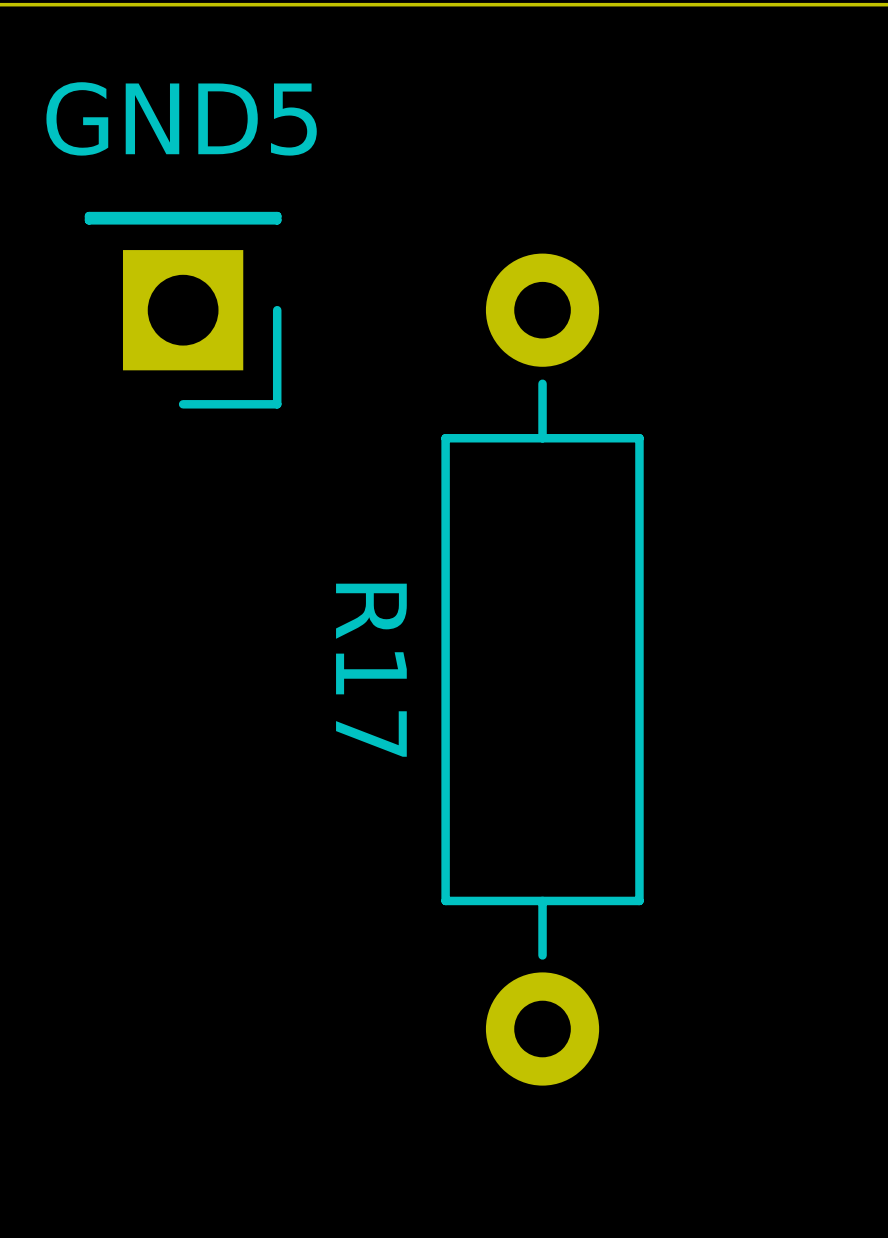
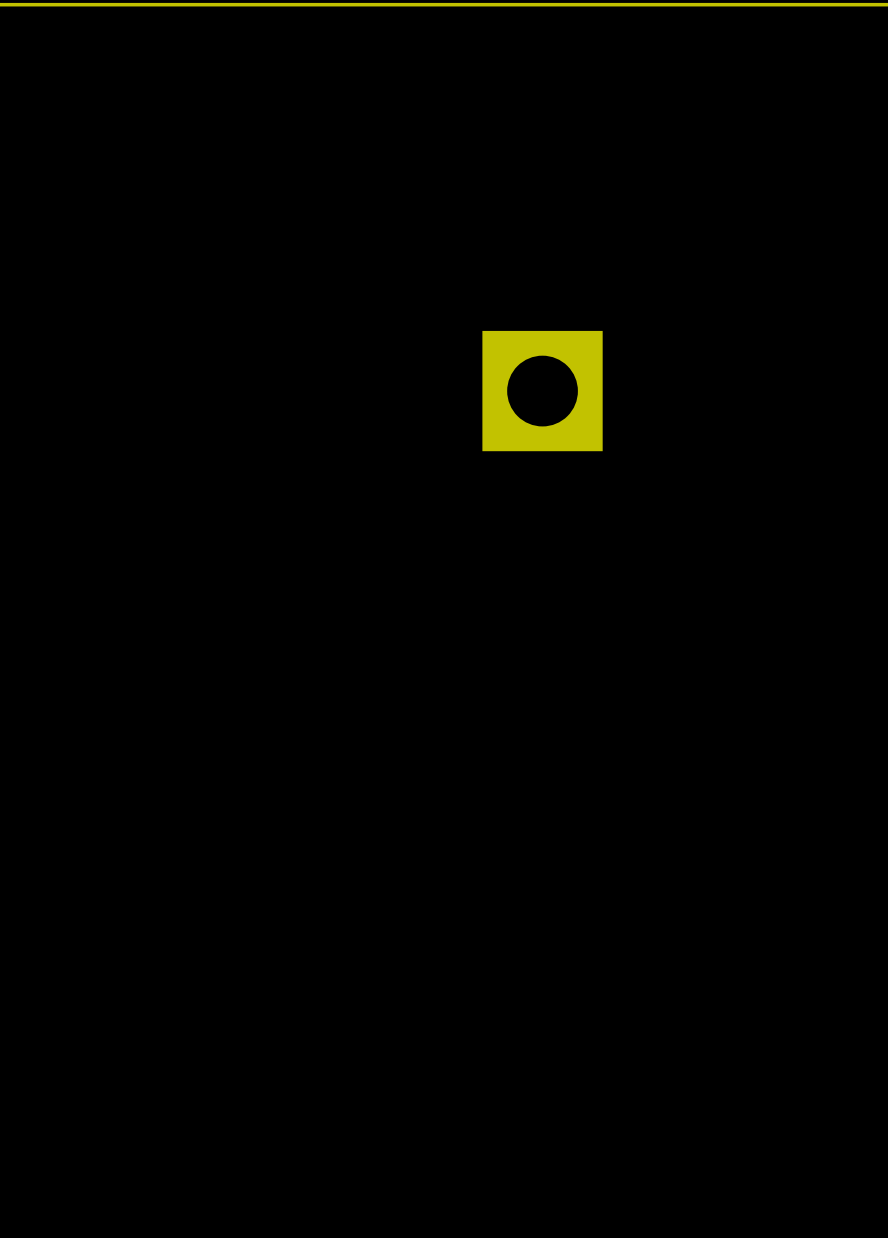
GND5 side: bottom (183, 310) -> top (542, 391)
R17: (542, 669) -> none

